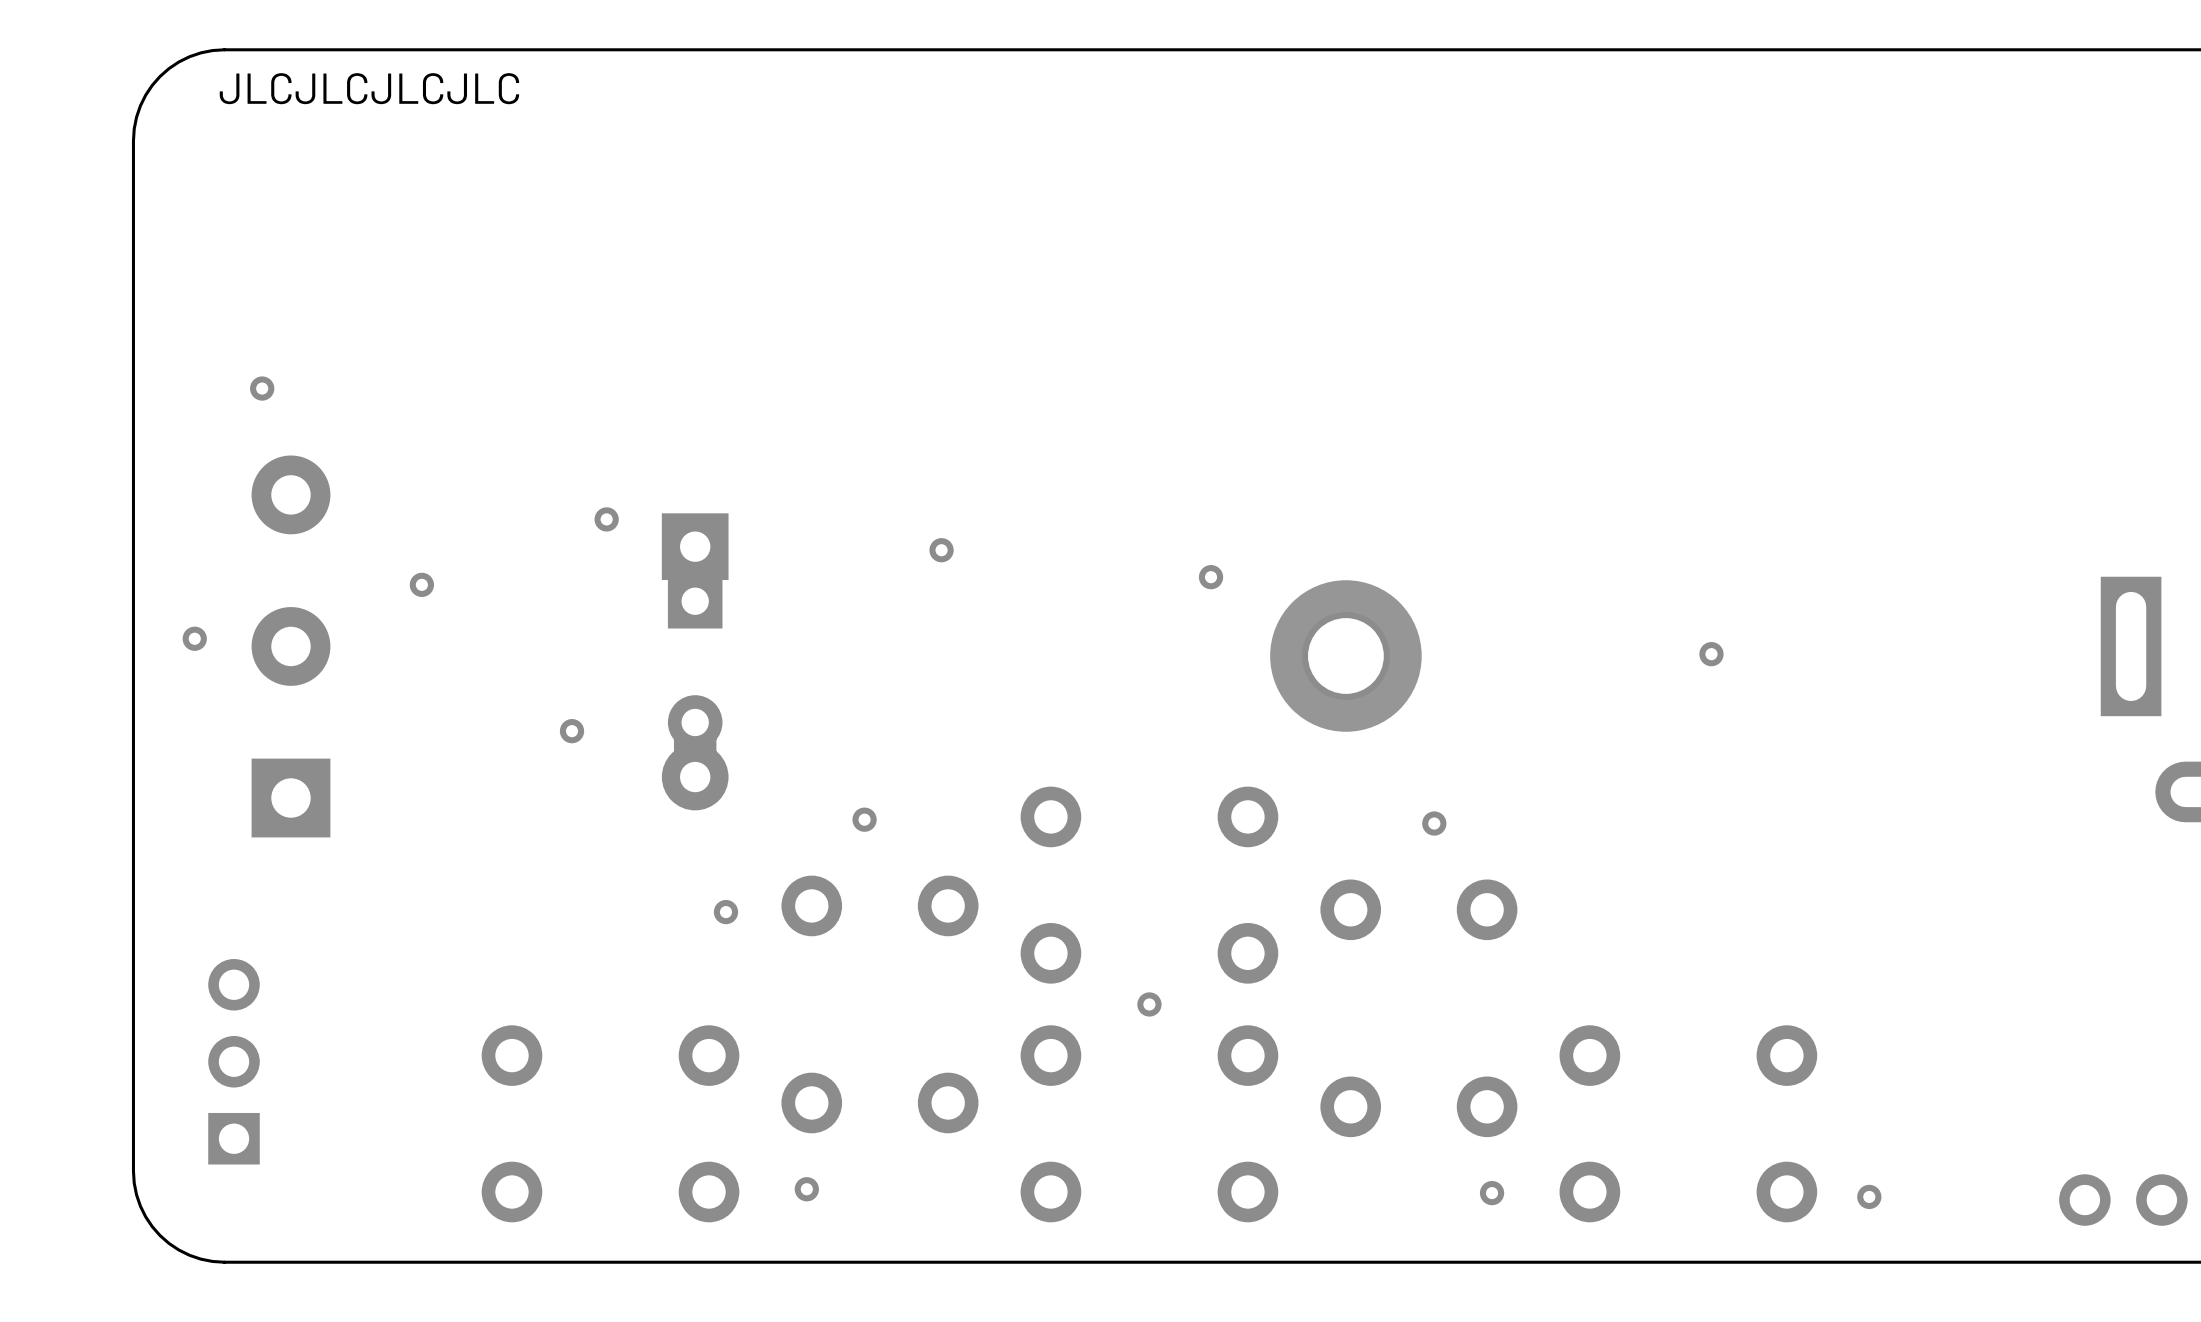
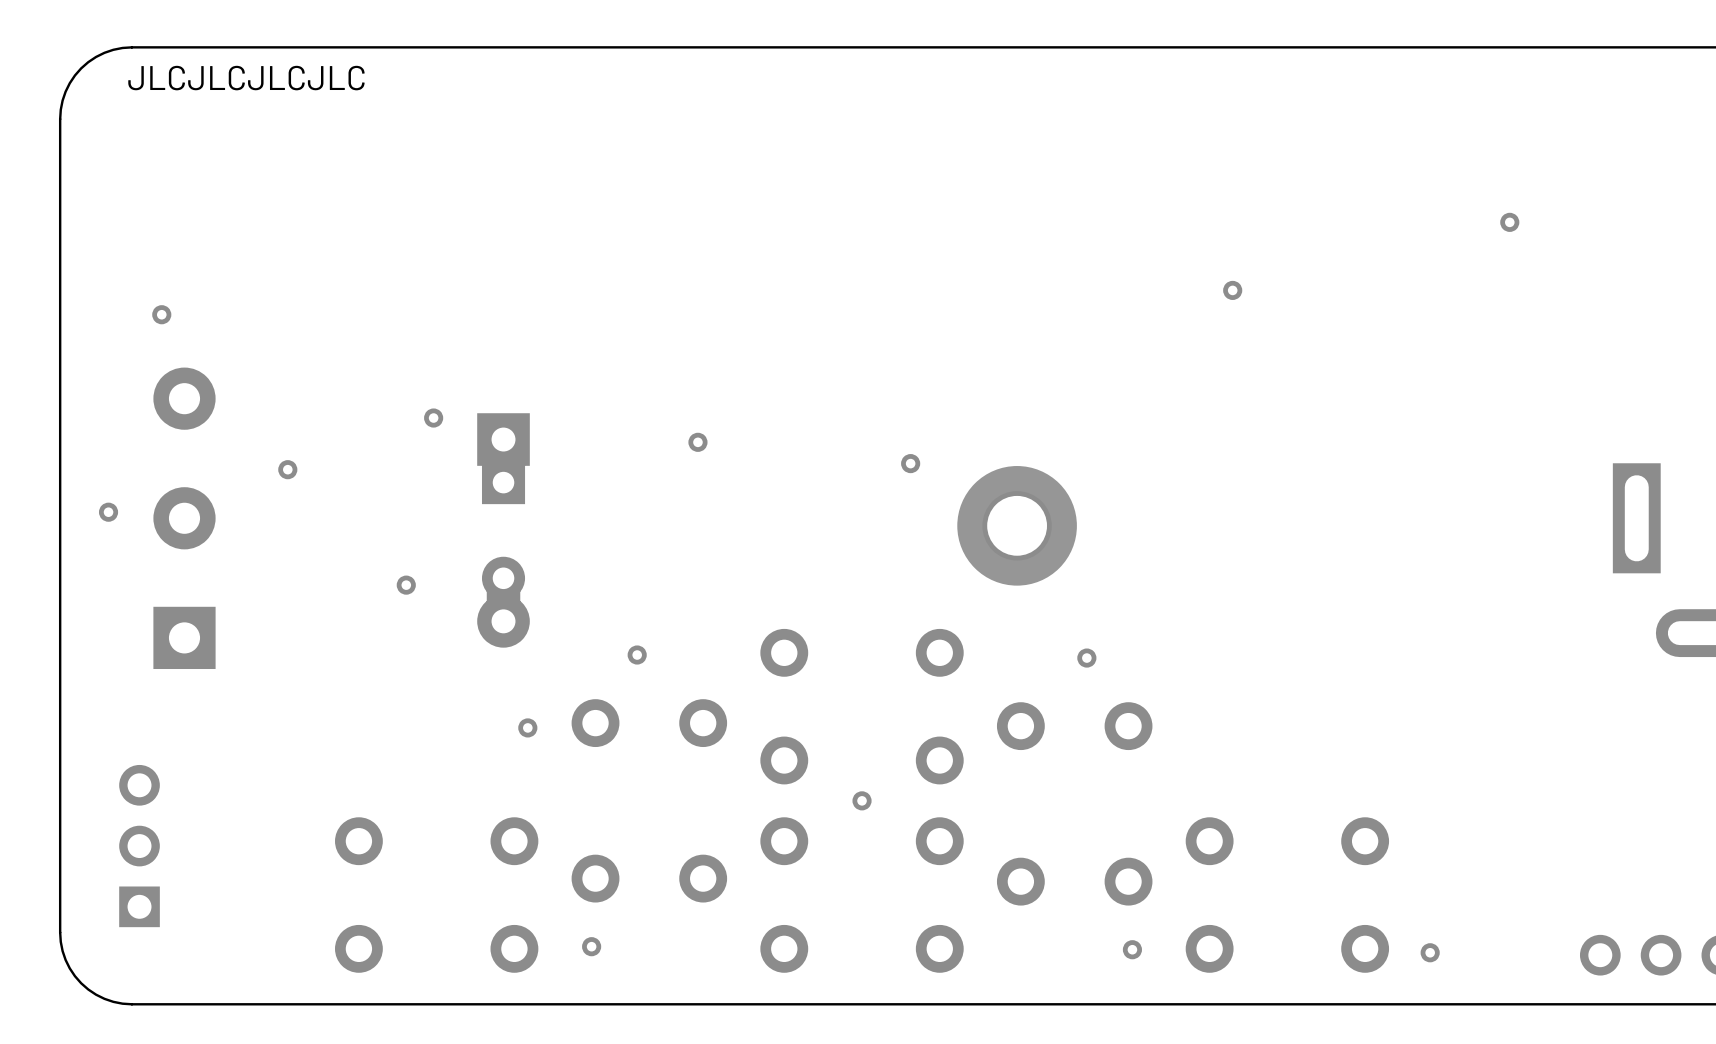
via: none -> (1509, 222)
via: none -> (1232, 290)
via: (1711, 654) -> none

